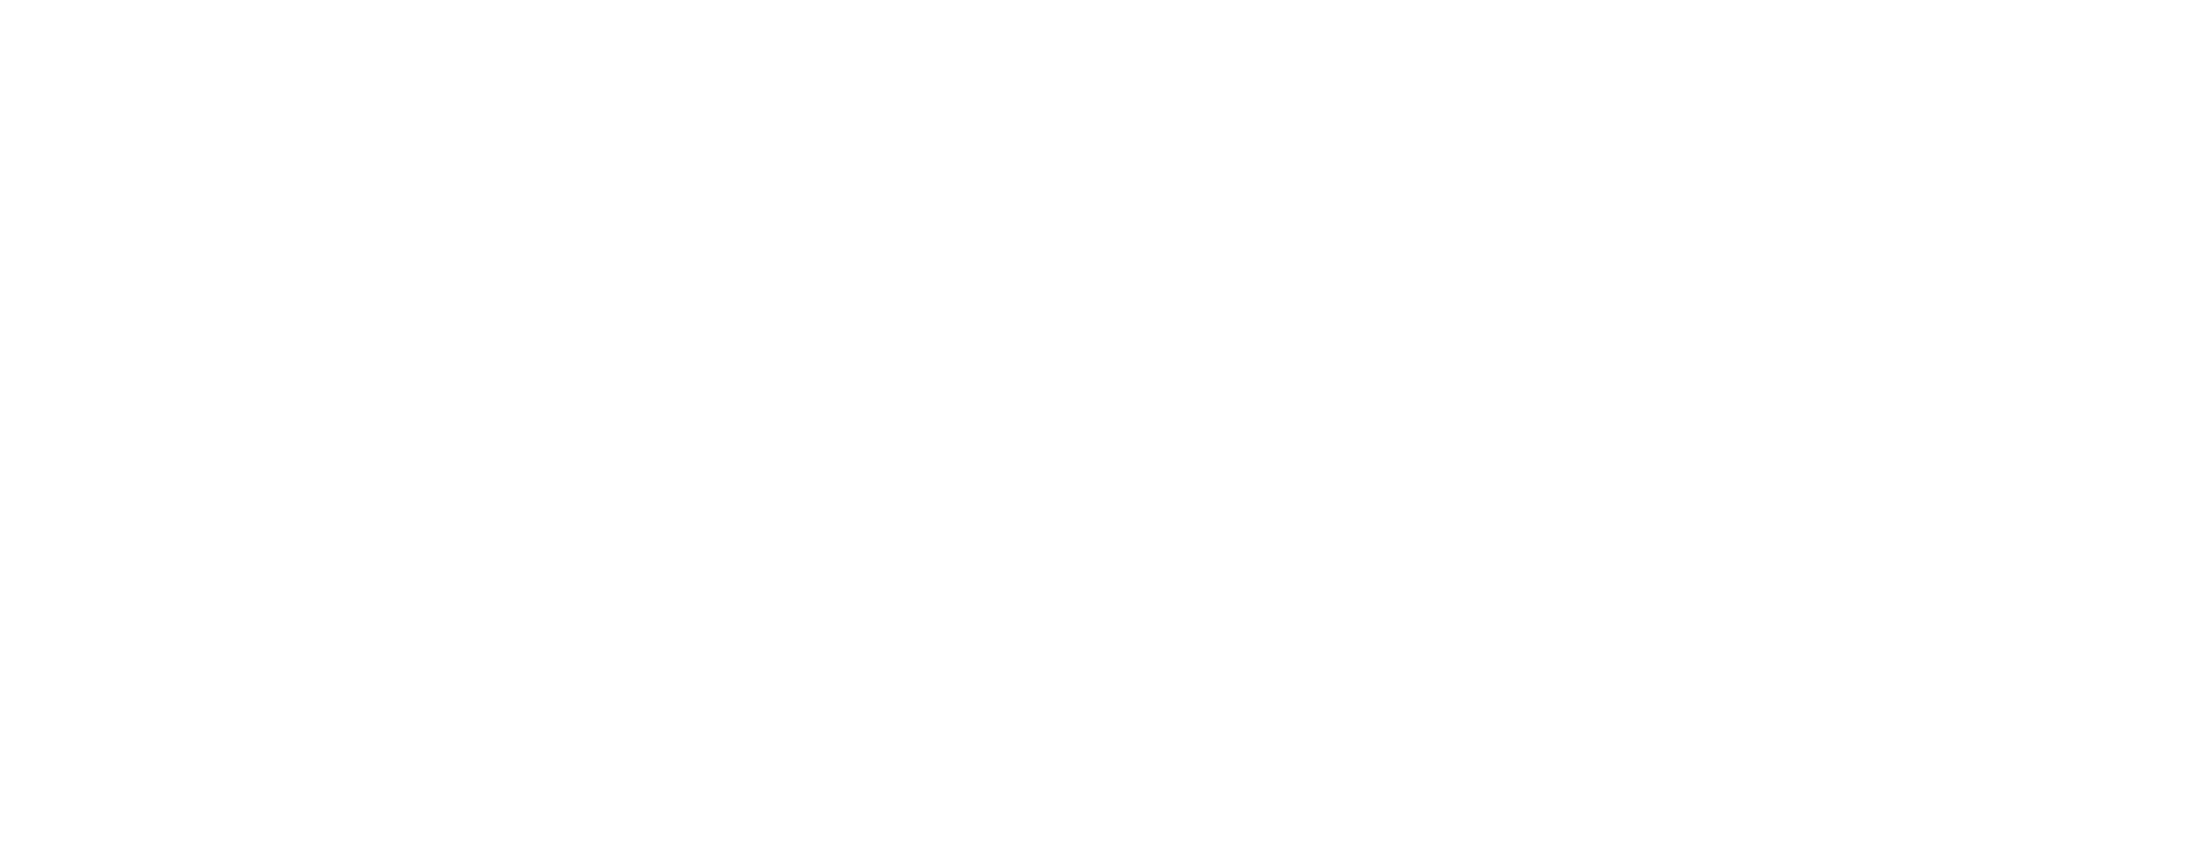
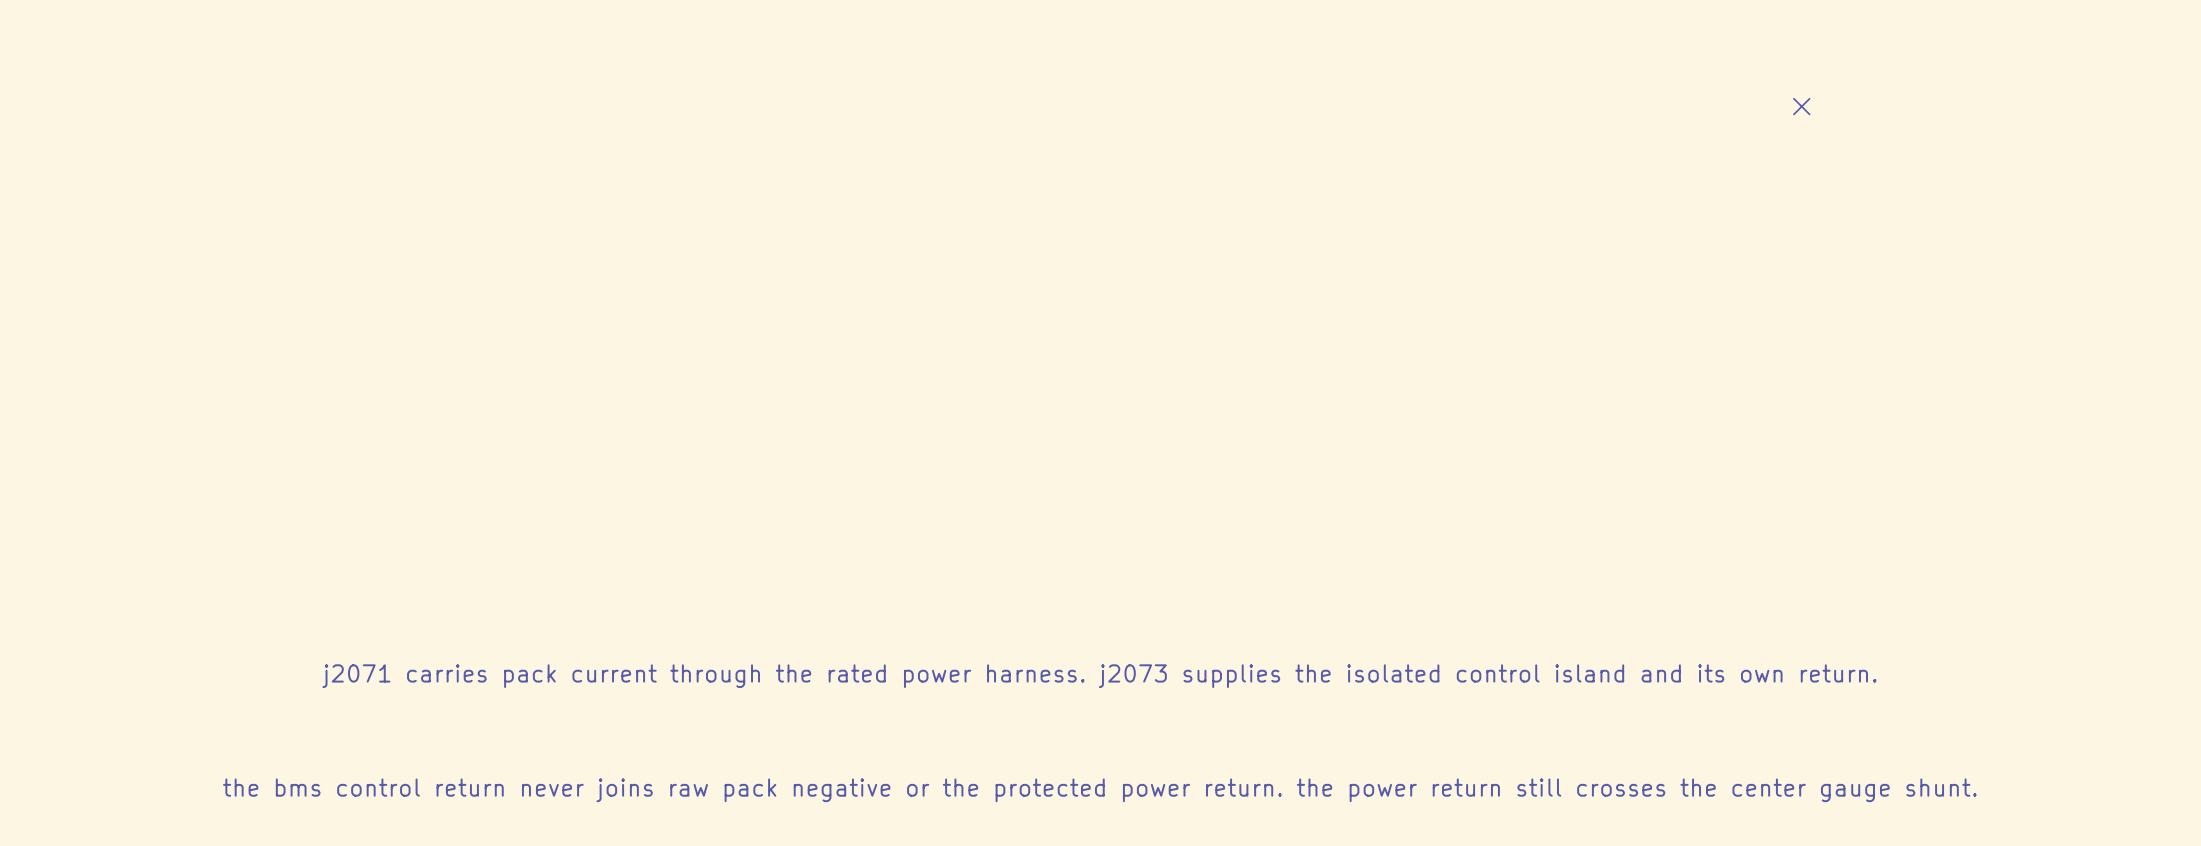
no-connect mark: none -> (1801, 106)
text: none -> j2071 carries pack current through the rated power harness. j2073 supplies the isolated control island and its own return. (1099, 676)
text: none -> the bms control return never joins raw pack negative or the protected power return. the power return still crosses the center gauge shunt. (1099, 790)

